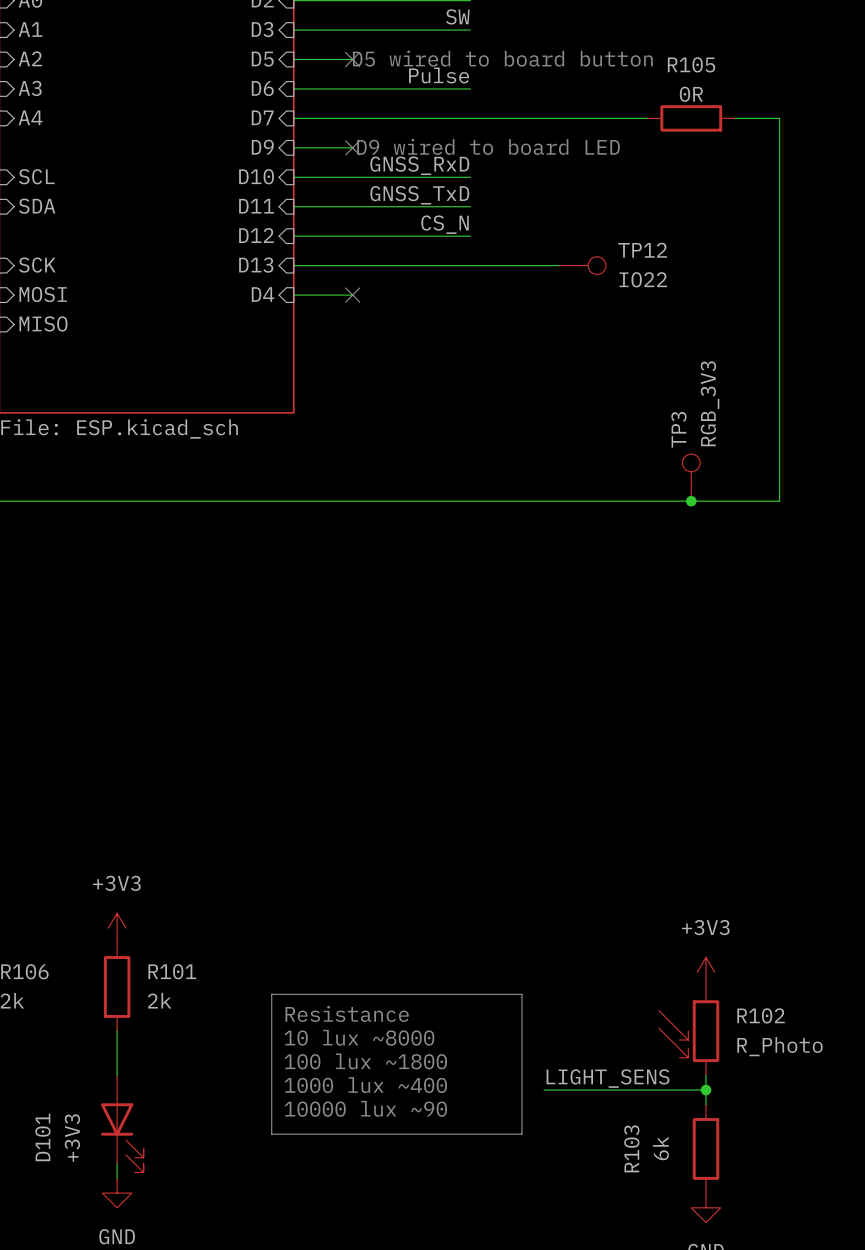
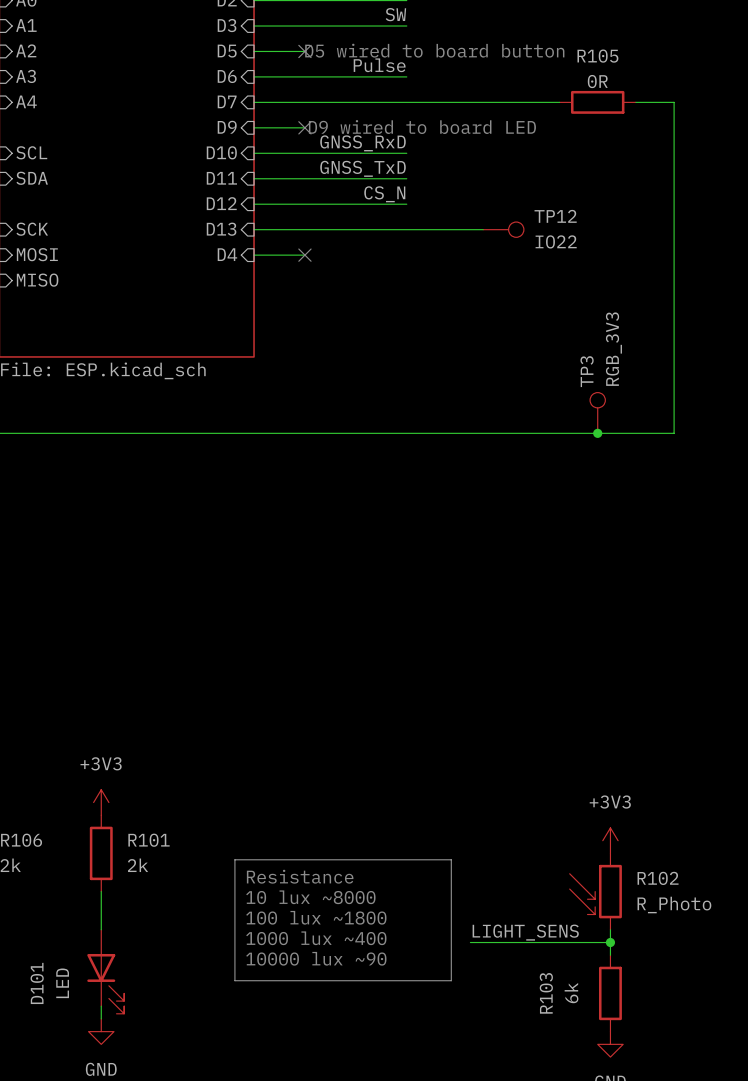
D101 value: +3V3 (72, 1138) -> LED (62, 983)

